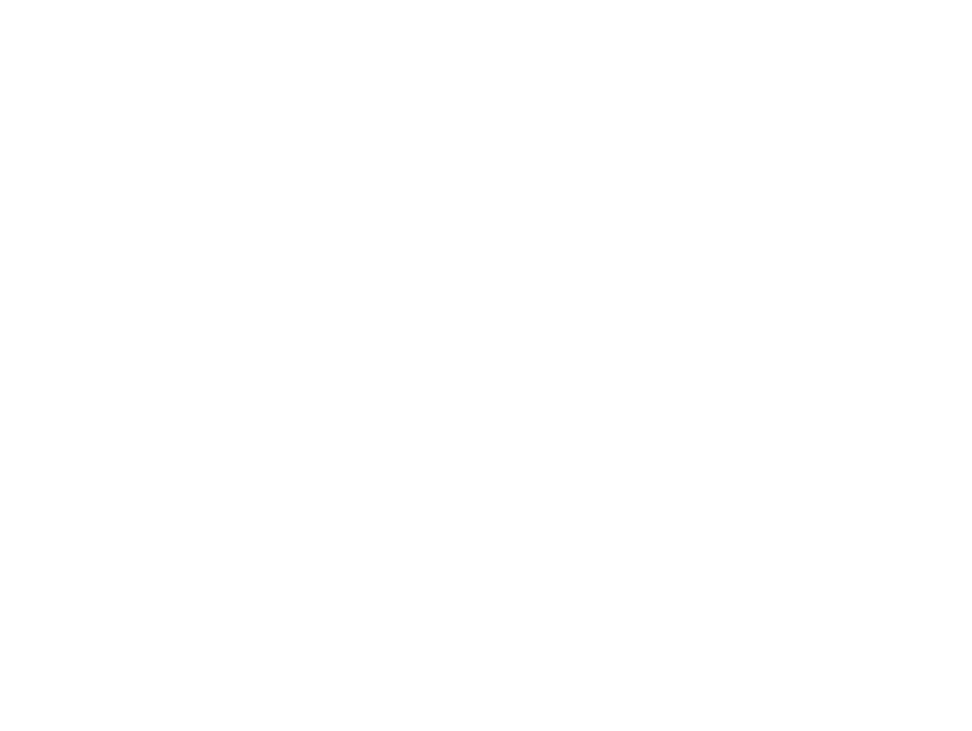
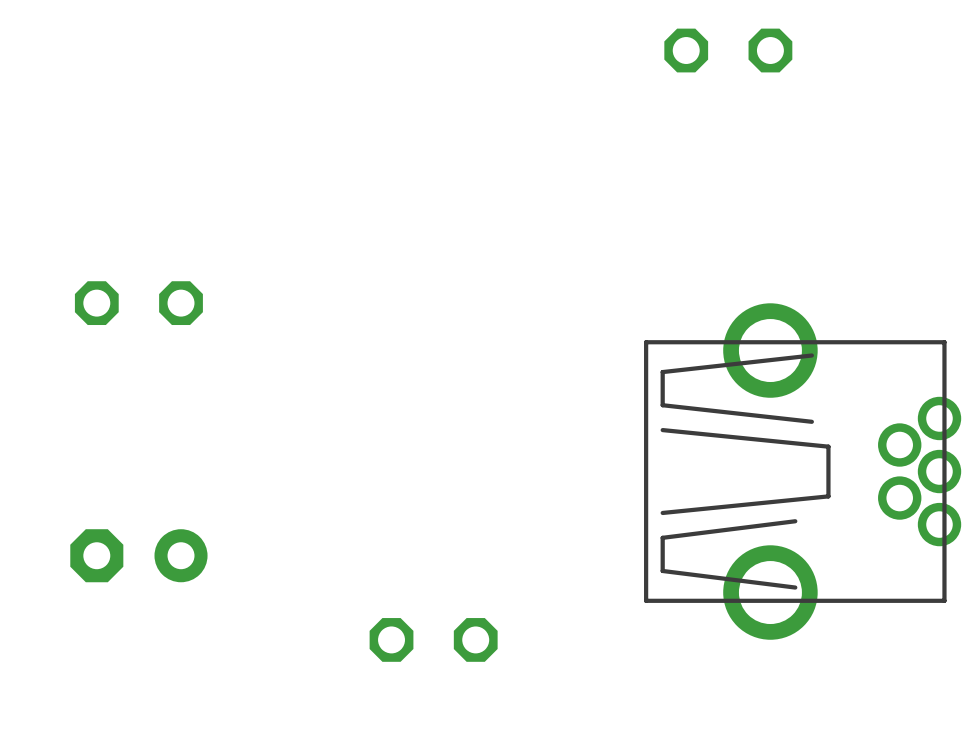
part: none -> (728, 50)
part: none -> (138, 303)
part: none -> (802, 471)
part: none -> (138, 555)
part: none -> (433, 639)

